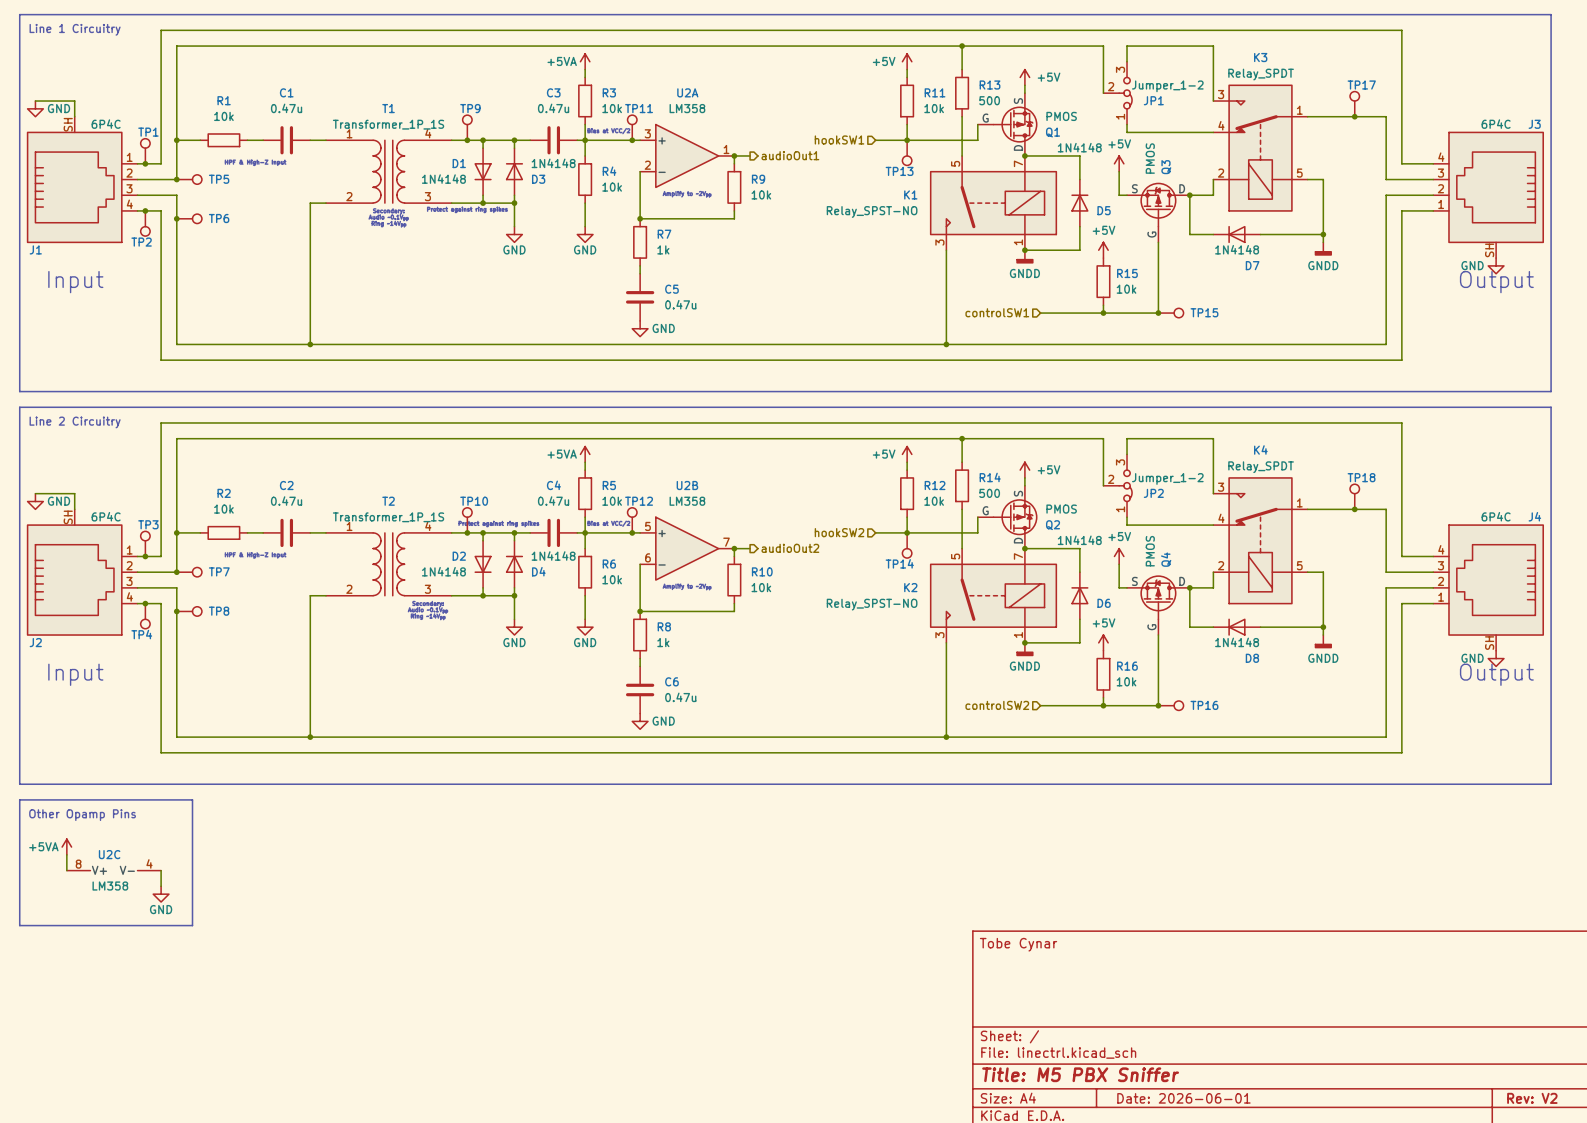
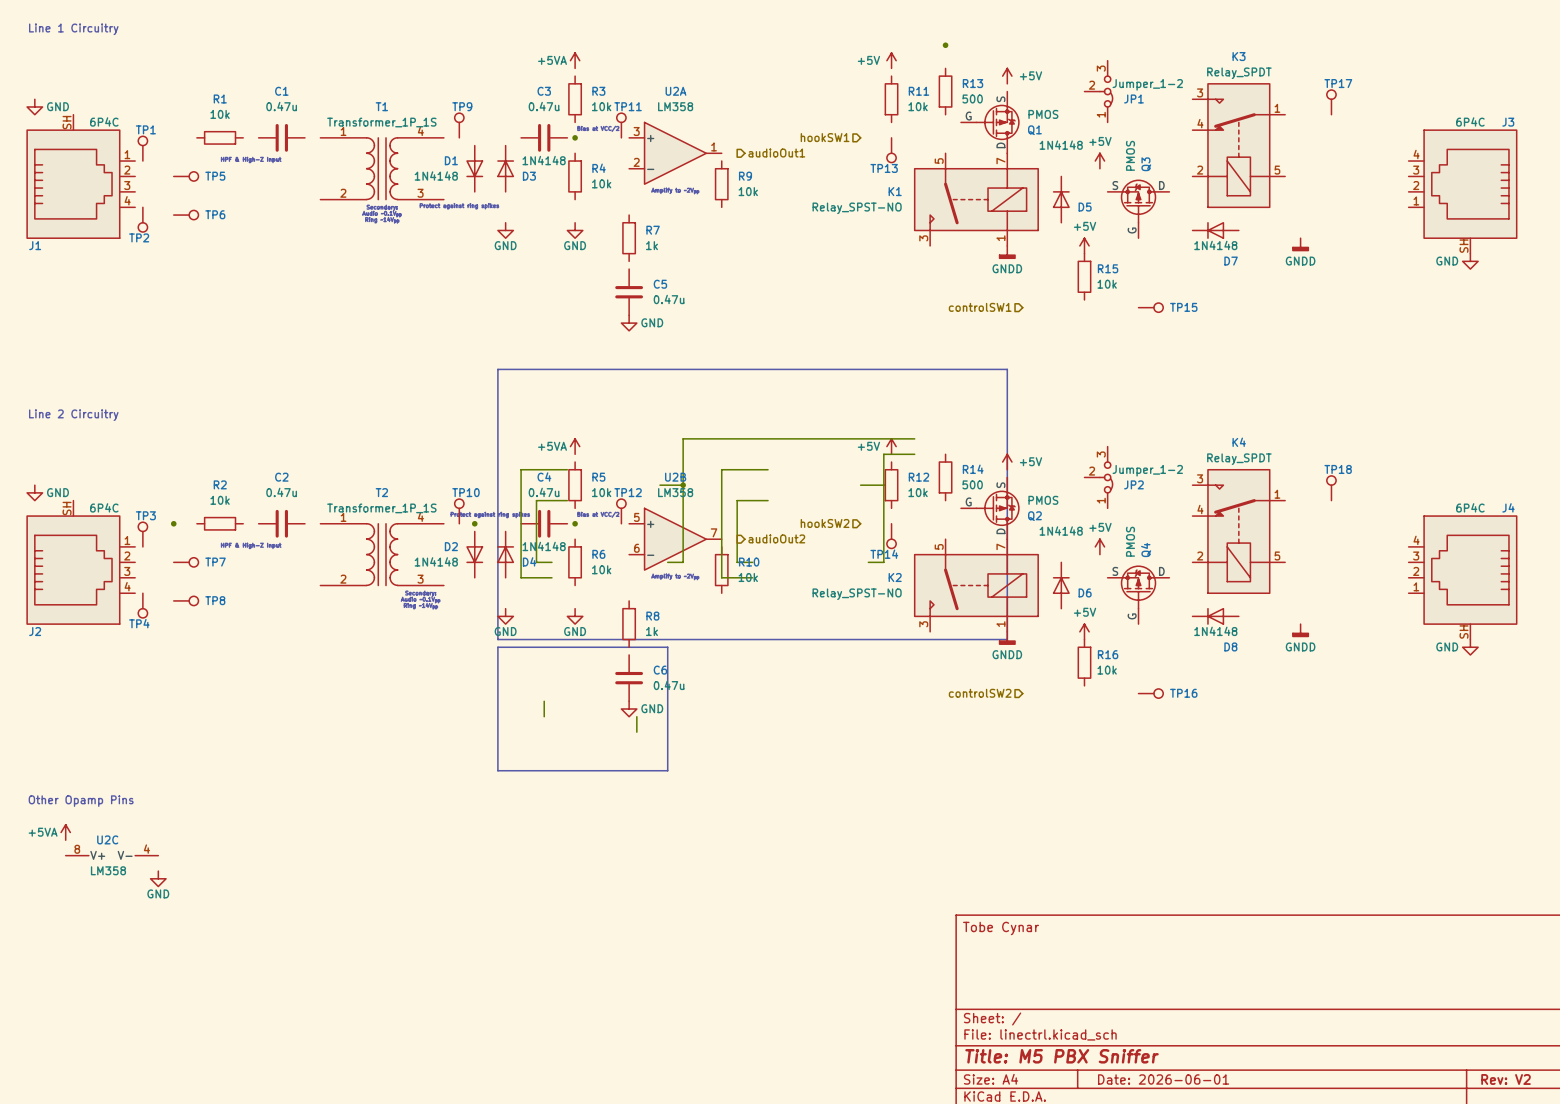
line: (19, 14) (19, 391) (1551, 391) (1551, 14) (19, 14) -> none
wire: (962, 46) (962, 69) -> none
wire: (1127, 61) (1127, 46) (1213, 46) (1213, 101) -> none
wire: (585, 69) (585, 77) -> none
wire: (907, 69) (907, 77) -> none
wire: (1024, 85) (1024, 93) -> none
wire: (1103, 93) (1103, 46) (176, 46) (176, 179) (137, 179) -> none
wire: (35, 101) (74, 101) (74, 116) -> none
wire: (962, 116) (962, 155) -> none
wire: (1307, 116) (1386, 116) (1386, 179) (1433, 179) -> none
junction: (1354, 116) -> none
wire: (585, 124) (585, 155) -> none
wire: (907, 124) (907, 140) -> none
wire: (977, 124) (977, 140) (875, 140) -> none
wire: (1127, 124) (1127, 132) (1213, 132) -> none
wire: (176, 140) (200, 140) -> none
junction: (176, 140) -> none
wire: (247, 140) (263, 140) -> none
wire: (310, 140) (326, 140) -> none
wire: (451, 140) (530, 140) -> none
junction: (467, 140) -> none
wire: (483, 140) (483, 148) -> none
junction: (483, 140) -> none
wire: (514, 140) (514, 148) -> none
junction: (514, 140) -> none
wire: (577, 140) (640, 140) -> none
junction: (632, 140) -> none
junction: (907, 140) -> none
junction: (734, 155) -> none
wire: (750, 155) (734, 155) (734, 163) -> none
wire: (1024, 155) (1079, 155) (1079, 179) -> none
junction: (1024, 155) -> none
wire: (137, 163) (161, 163) (161, 30) (1401, 30) (1401, 163) (1433, 163) -> none
junction: (145, 163) -> none
wire: (640, 171) (640, 218) (734, 218) (734, 210) -> none
wire: (1119, 171) (1119, 195) (1127, 195) -> none
junction: (176, 179) -> none
wire: (1213, 179) (1213, 195) (1189, 195) (1189, 234) (1213, 234) -> none
wire: (1307, 179) (1323, 179) (1323, 242) -> none
wire: (137, 195) (176, 195) (176, 344) (1386, 344) (1386, 195) (1433, 195) -> none
wire: (483, 195) (483, 203) -> none
wire: (514, 195) (514, 226) -> none
junction: (1189, 195) -> none
wire: (326, 203) (310, 203) (310, 344) -> none
wire: (451, 203) (514, 203) -> none
junction: (483, 203) -> none
junction: (514, 203) -> none
wire: (585, 203) (585, 226) -> none
wire: (137, 210) (161, 210) (161, 360) (1401, 360) (1401, 210) (1433, 210) -> none
junction: (145, 210) -> none
junction: (176, 218) -> none
junction: (640, 218) -> none
wire: (1079, 226) (1079, 250) (1024, 250) -> none
wire: (1260, 234) (1323, 234) -> none
junction: (1323, 234) -> none
wire: (1158, 242) (1158, 313) (1040, 313) -> none
wire: (946, 250) (946, 344) -> none
junction: (1024, 250) -> none
wire: (640, 265) (640, 273) -> none
text: Input (75, 282) -> none
text: Output (1496, 282) -> none
wire: (1103, 305) (1103, 313) -> none
junction: (1103, 313) -> none
junction: (1158, 313) -> none
junction: (310, 344) -> none
junction: (946, 344) -> none
line: none -> (497, 369) (497, 639) (1007, 639) (1007, 369) (497, 369)
wire: (962, 438) (962, 462) -> none
junction: (962, 438) -> none
wire: none -> (914, 438) (683, 438) (683, 562) (667, 562)
wire: (1127, 454) (1127, 438) (1213, 438) (1213, 493) -> none
wire: (585, 462) (585, 470) -> none
wire: (907, 462) (907, 470) -> none
wire: none -> (914, 454) (883, 454) (883, 562) (868, 562)
wire: none -> (567, 469) (521, 469) (521, 577) (551, 577)
wire: (1103, 485) (1103, 438) (176, 438) (176, 572) (137, 572) -> none
wire: (35, 493) (74, 493) (74, 509) -> none
wire: none -> (659, 485) (683, 485)
junction: none -> (683, 485)
wire: none -> (860, 485) (883, 485)
wire: none -> (567, 500) (536, 500) (536, 562) (551, 562)
wire: none -> (768, 500) (737, 500) (737, 562) (752, 562)
wire: (962, 509) (962, 548) -> none
wire: (1307, 509) (1386, 509) (1386, 572) (1433, 572) -> none
junction: (1354, 509) -> none
wire: (585, 517) (585, 548) -> none
wire: (907, 517) (907, 532) -> none
wire: (977, 517) (977, 532) (875, 532) -> none
wire: (1127, 517) (1127, 525) (1213, 525) -> none
wire: (176, 532) (200, 532) -> none
wire: (247, 532) (263, 532) -> none
wire: (310, 532) (326, 532) -> none
wire: (451, 532) (530, 532) -> none
junction: (467, 532) -> none
wire: (483, 532) (483, 540) -> none
wire: (514, 532) (514, 540) -> none
junction: (514, 532) -> none
wire: (577, 532) (640, 532) -> none
junction: (632, 532) -> none
junction: (907, 532) -> none
wire: (734, 548) (750, 548) -> (721, 539) (721, 469) (768, 469)
junction: (734, 548) -> none
wire: (1024, 548) (1079, 548) (1079, 572) -> none
junction: (1024, 548) -> none
wire: (137, 556) (161, 556) (161, 422) (1401, 422) (1401, 556) (1433, 556) -> none
junction: (145, 556) -> none
wire: none -> (721, 546) (721, 577) (752, 577)
wire: (640, 564) (640, 611) (734, 611) (734, 603) -> none
wire: (1119, 564) (1119, 587) (1127, 587) -> none
junction: (176, 572) -> none
wire: (1213, 572) (1213, 587) (1189, 587) (1189, 627) (1213, 627) -> none
wire: (1307, 572) (1323, 572) (1323, 635) -> none
wire: (137, 587) (176, 587) (176, 737) (1386, 737) (1386, 587) (1433, 587) -> none
wire: (483, 587) (483, 595) -> none
wire: (514, 587) (514, 619) -> none
junction: (1189, 587) -> none
wire: (326, 595) (310, 595) (310, 737) -> none
wire: (451, 595) (514, 595) -> none
junction: (483, 595) -> none
junction: (514, 595) -> none
wire: (585, 595) (585, 619) -> none
wire: (137, 603) (161, 603) (161, 752) (1401, 752) (1401, 603) (1433, 603) -> none
junction: (145, 603) -> none
junction: (176, 611) -> none
junction: (640, 611) -> none
wire: (1079, 619) (1079, 642) (1024, 642) -> none
wire: (1260, 627) (1323, 627) -> none
junction: (1323, 627) -> none
wire: (1158, 635) (1158, 705) (1040, 705) -> none
wire: (946, 642) (946, 737) -> none
junction: (1024, 642) -> none
wire: (640, 658) (640, 666) -> none
text: Input (75, 674) -> none
text: Output (1496, 674) -> none
wire: (1103, 697) (1103, 705) -> none
junction: (1103, 705) -> none
junction: (1158, 705) -> none
wire: none -> (544, 701) (544, 716)
wire: none -> (636, 716) (636, 732)
junction: (310, 737) -> none
junction: (946, 737) -> none
line: (506, 784) (19, 784) (19, 407) (1551, 407) (1551, 784) (679, 784) -> (497, 770) (497, 647) (667, 647) (667, 770)
line: (19, 799) (192, 799) (192, 925) (19, 925) (19, 799) -> none
wire: (66, 854) (66, 870) -> none
wire: (161, 870) (161, 886) -> none

